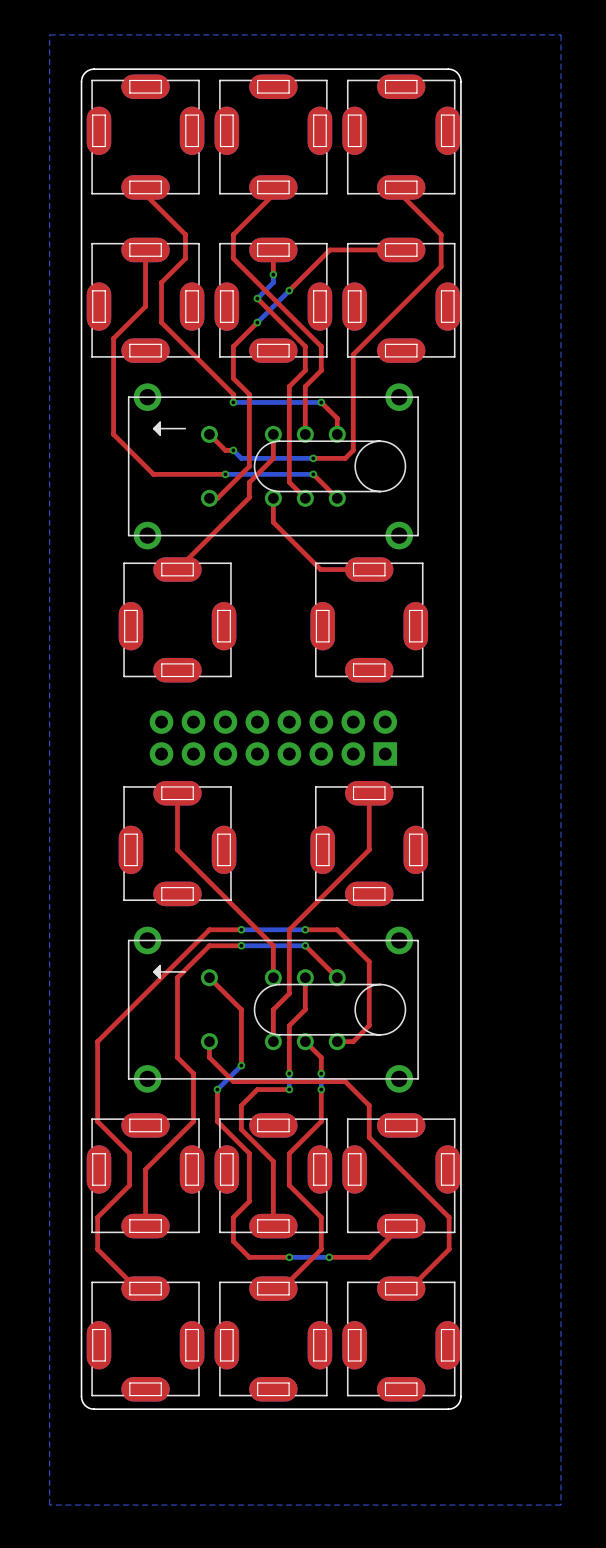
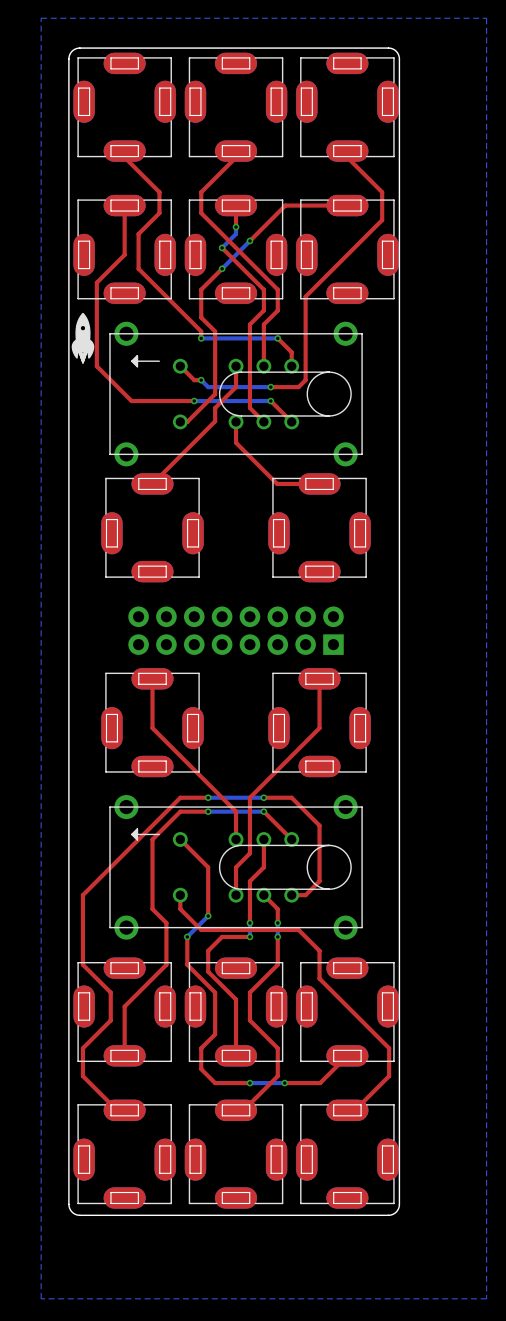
drawing: none -> [71, 312, 95, 364]

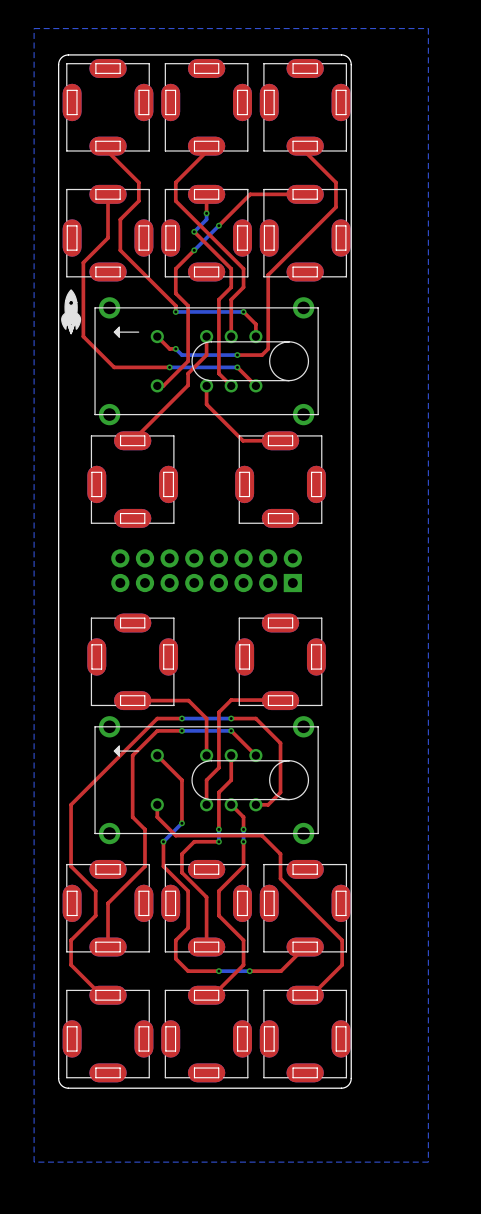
top track: (152, 678) (152, 728) (236, 811) -> (132, 700) (188, 700) (206, 718) (206, 730)
top track: (319, 678) (319, 728) (249, 797) -> (280, 700) (231, 700) (218, 712) (218, 718)
part rotation: 0° (152, 722) -> 180° (132, 661)
part rotation: 0° (319, 722) -> 180° (280, 661)

